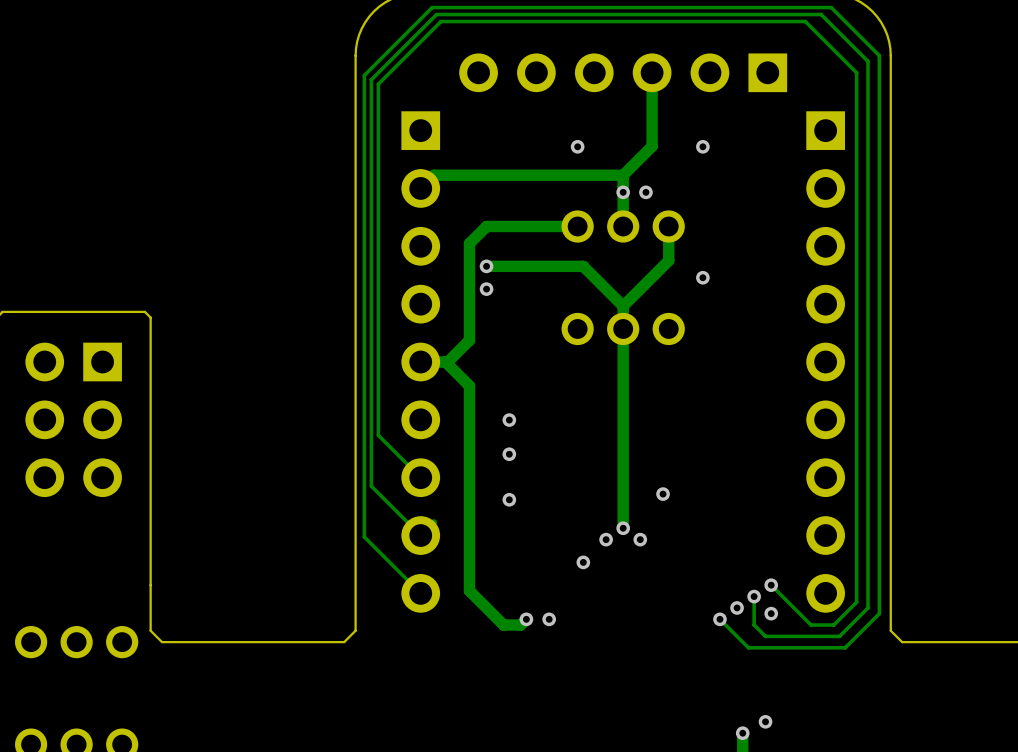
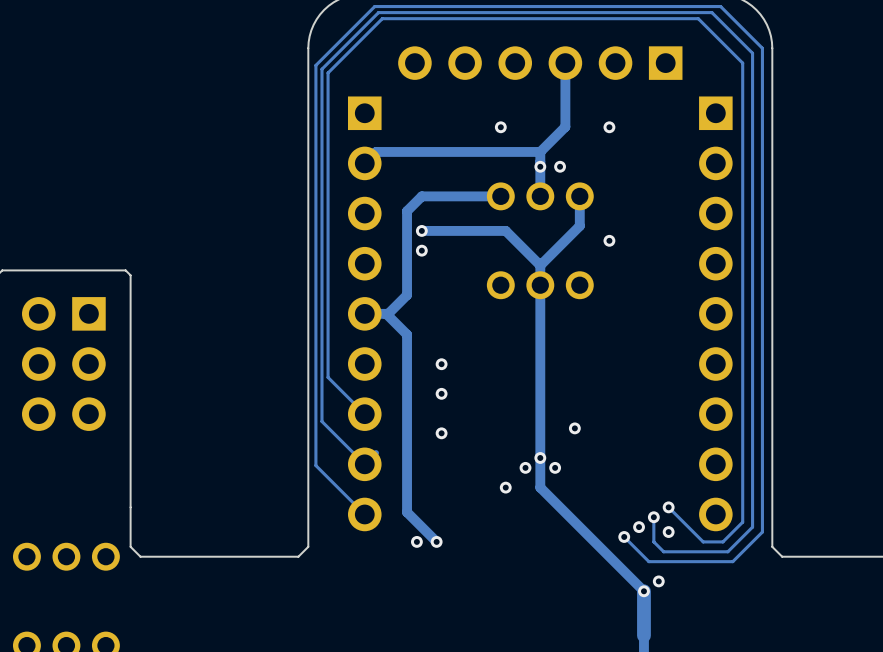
track: none -> (540, 457) (540, 487) (643, 591) (643, 635)
track: (526, 619) (520, 625) (503, 625) -> none
via: (526, 619) -> none
via: (549, 619) -> none
via: none -> (416, 541)
via: none -> (436, 541)
via: none -> (658, 581)
via: none -> (643, 591)
via: (765, 721) -> none
via: (742, 733) -> none

